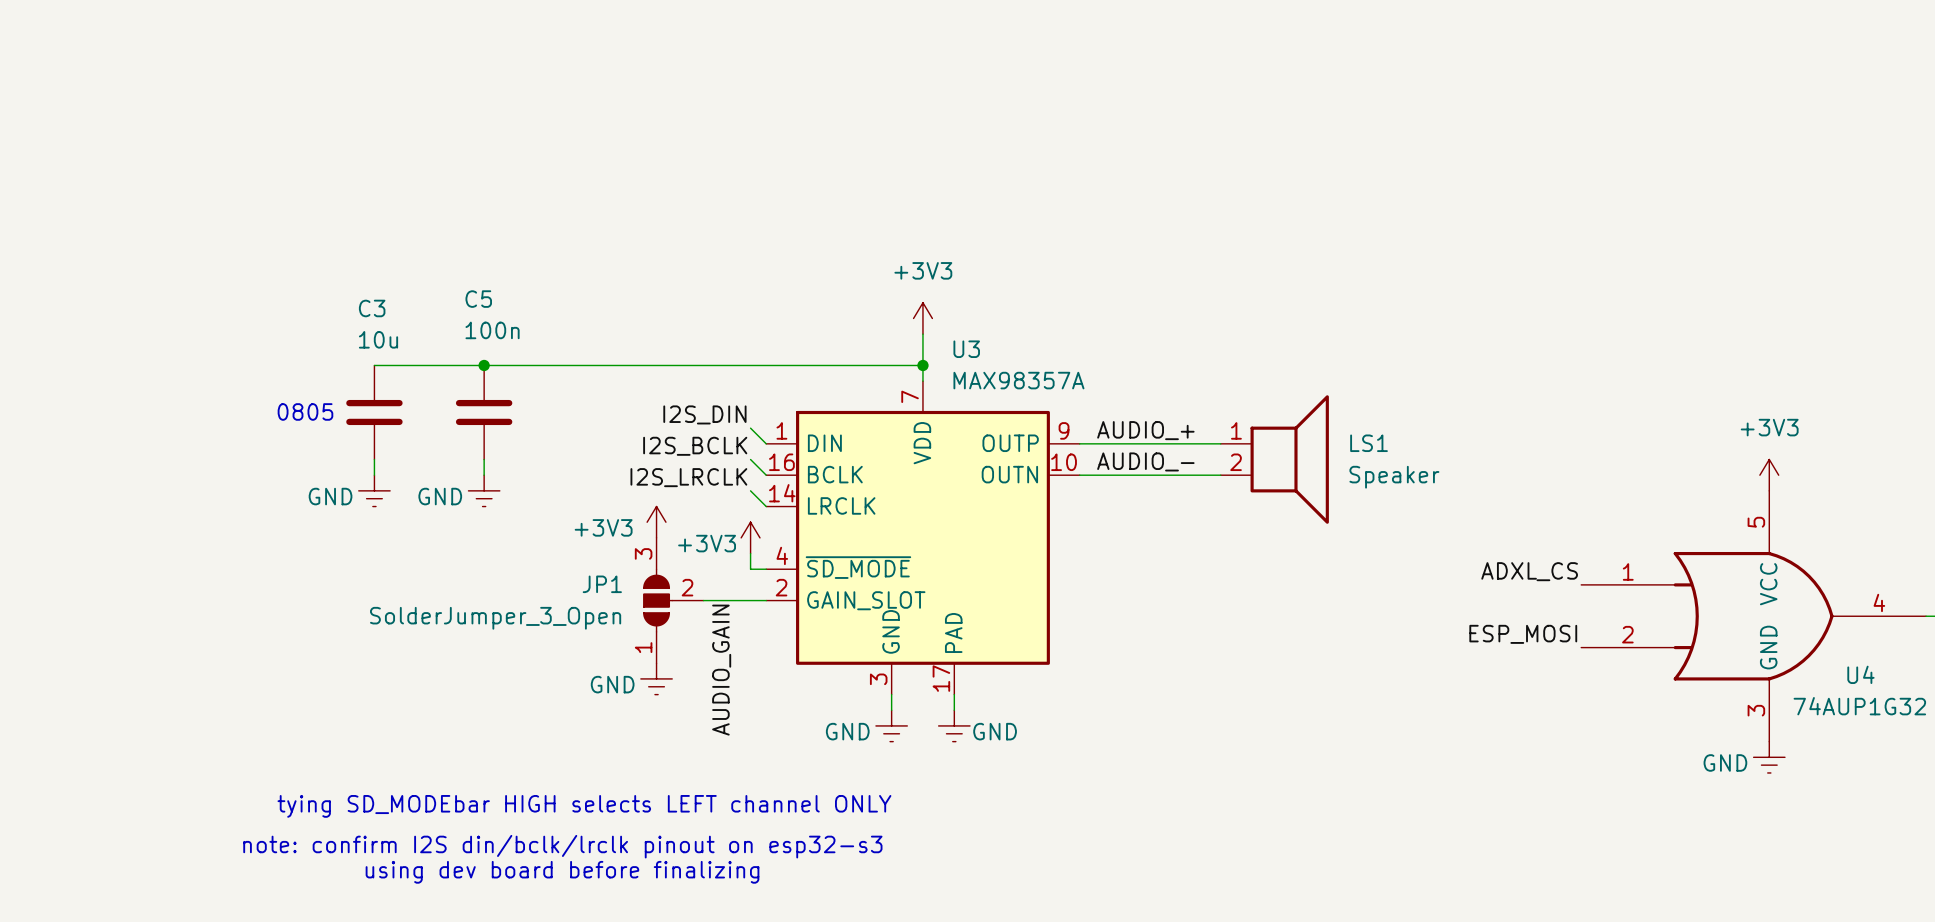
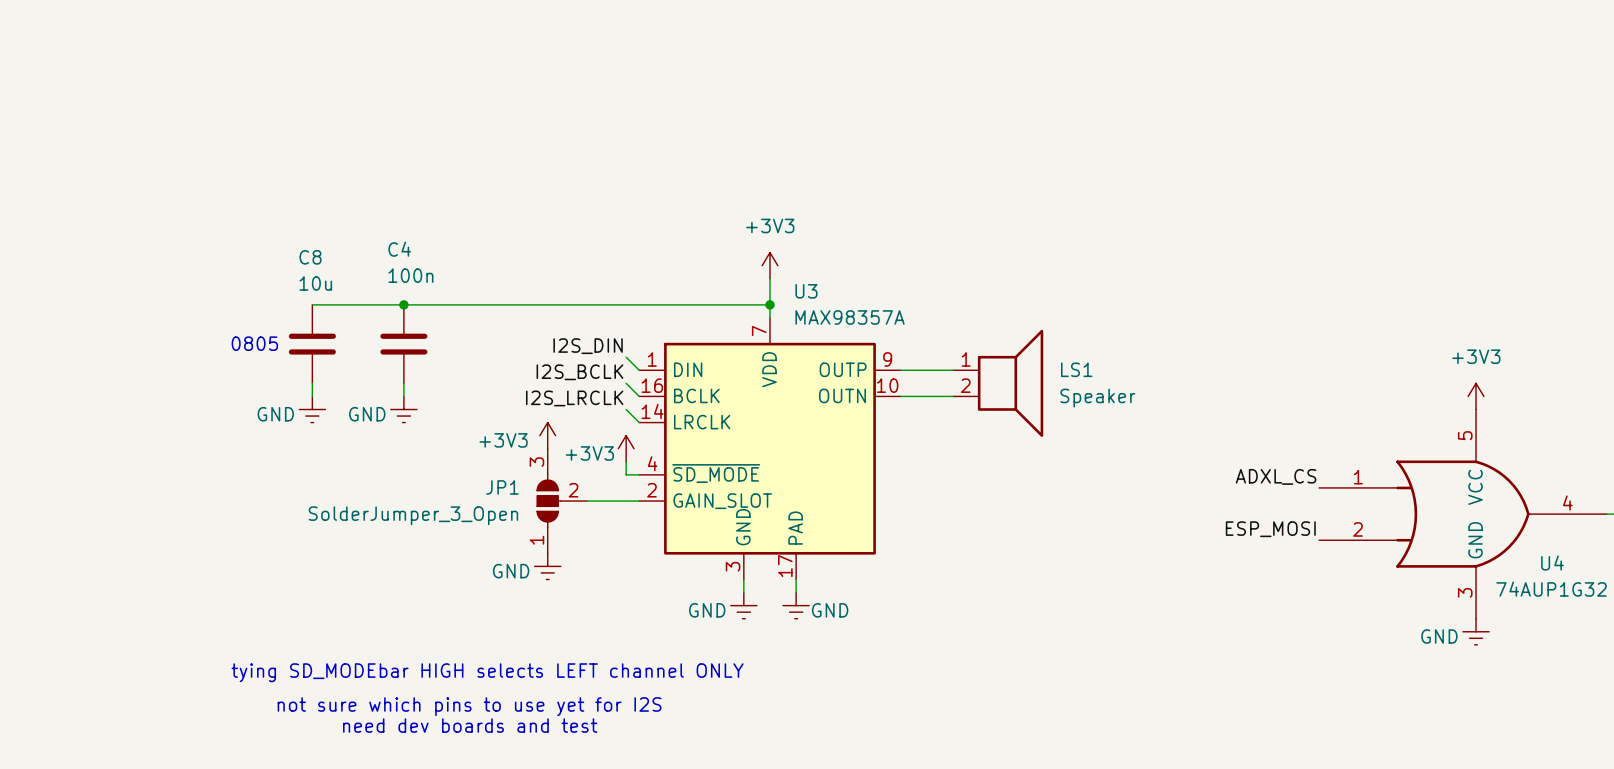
C5 name: C5 (478, 299) -> C4 (399, 249)
C3 name: C3 (372, 308) -> C8 (310, 257)
label: AUDIO_+ (1145, 430) -> none
wire: (1142, 443) (1220, 443) -> none
LS1 position: (1274, 459) -> (998, 383)
label: AUDIO_- (1145, 461) -> none
wire: (1142, 475) (1220, 475) -> none
label: AUDIO_GAIN (721, 670) -> none
text: note: confirm I2S din/bclk/lrclk pinout on esp32-s3 (562, 846) -> not sure which pins to use yet for I2S (469, 706)
text: using dev board before finalizing (562, 872) -> need dev boards and test (470, 725)

